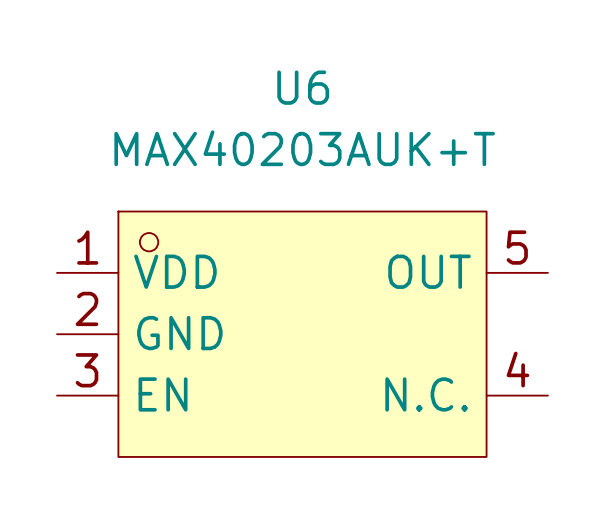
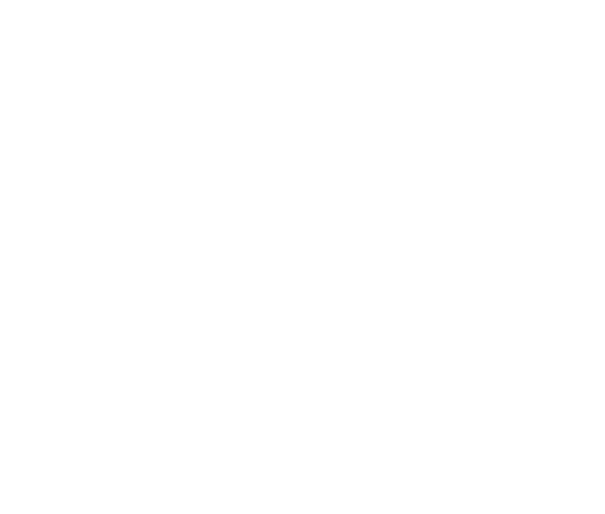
U6: MAX40203AUK+T (302, 334) -> none

